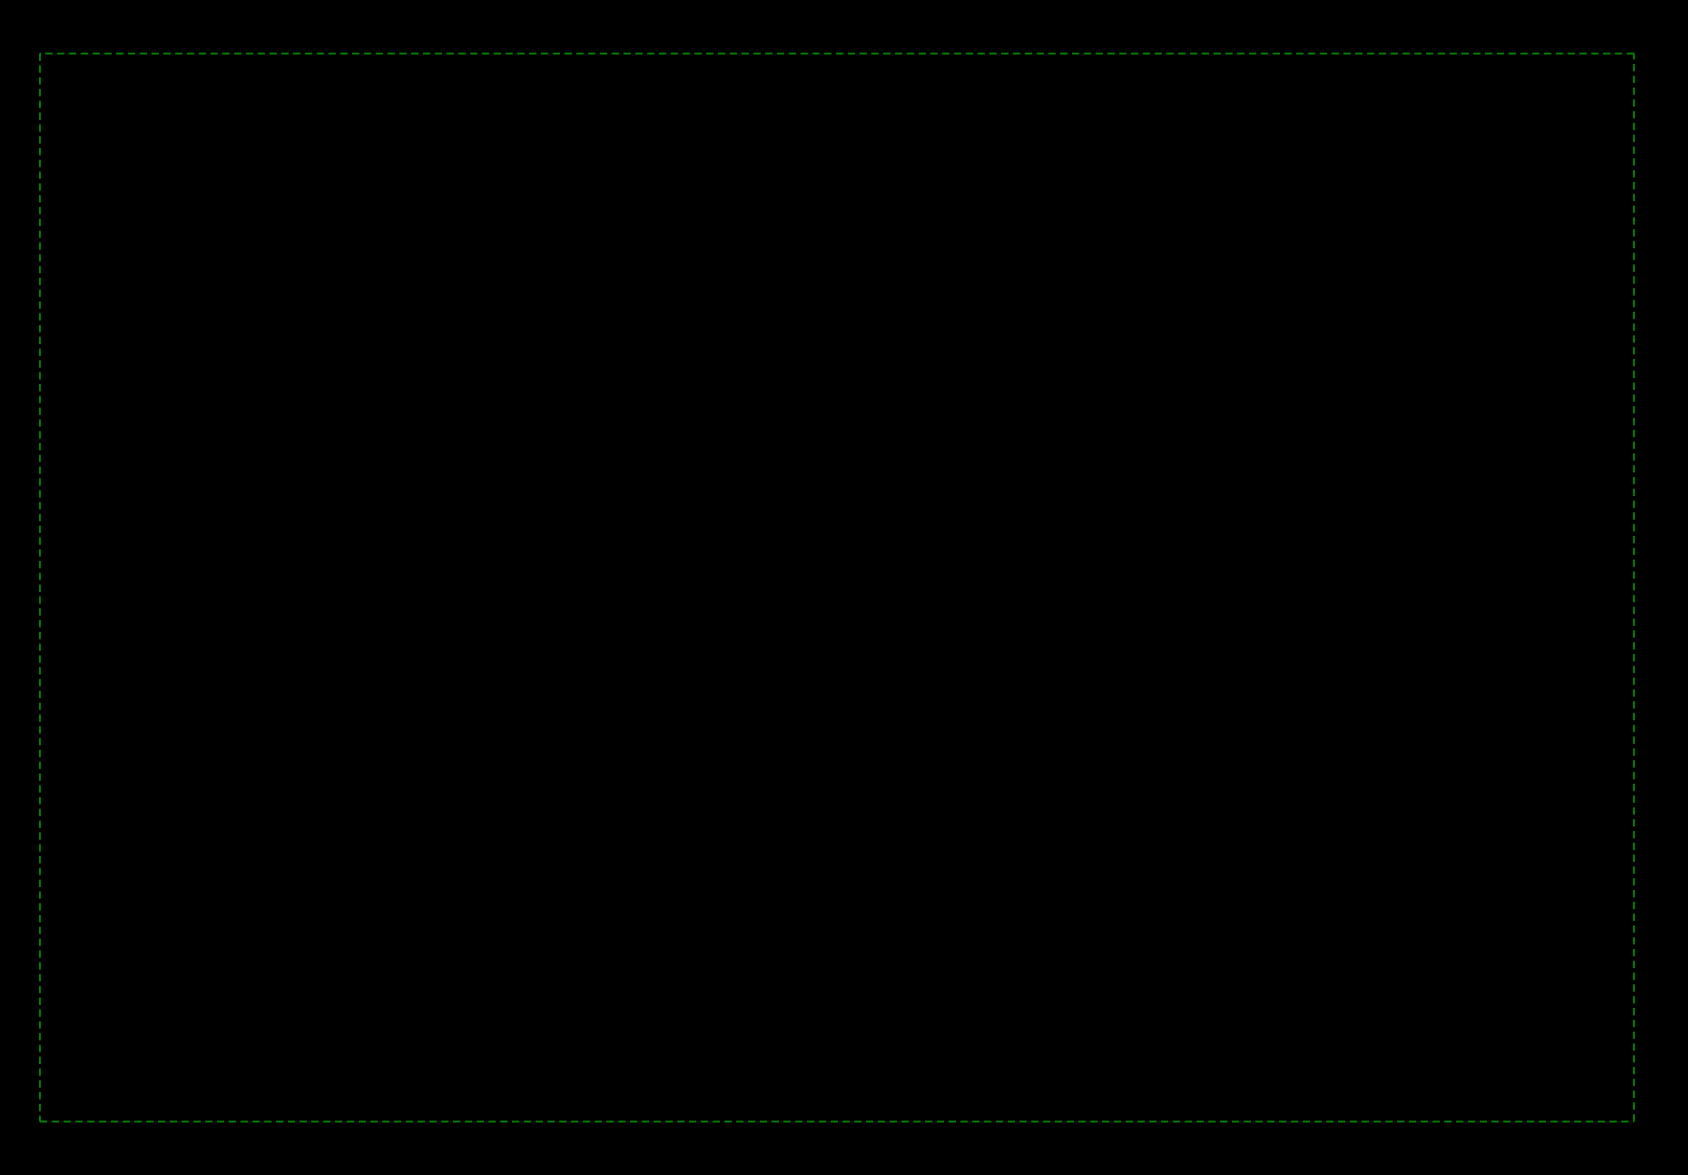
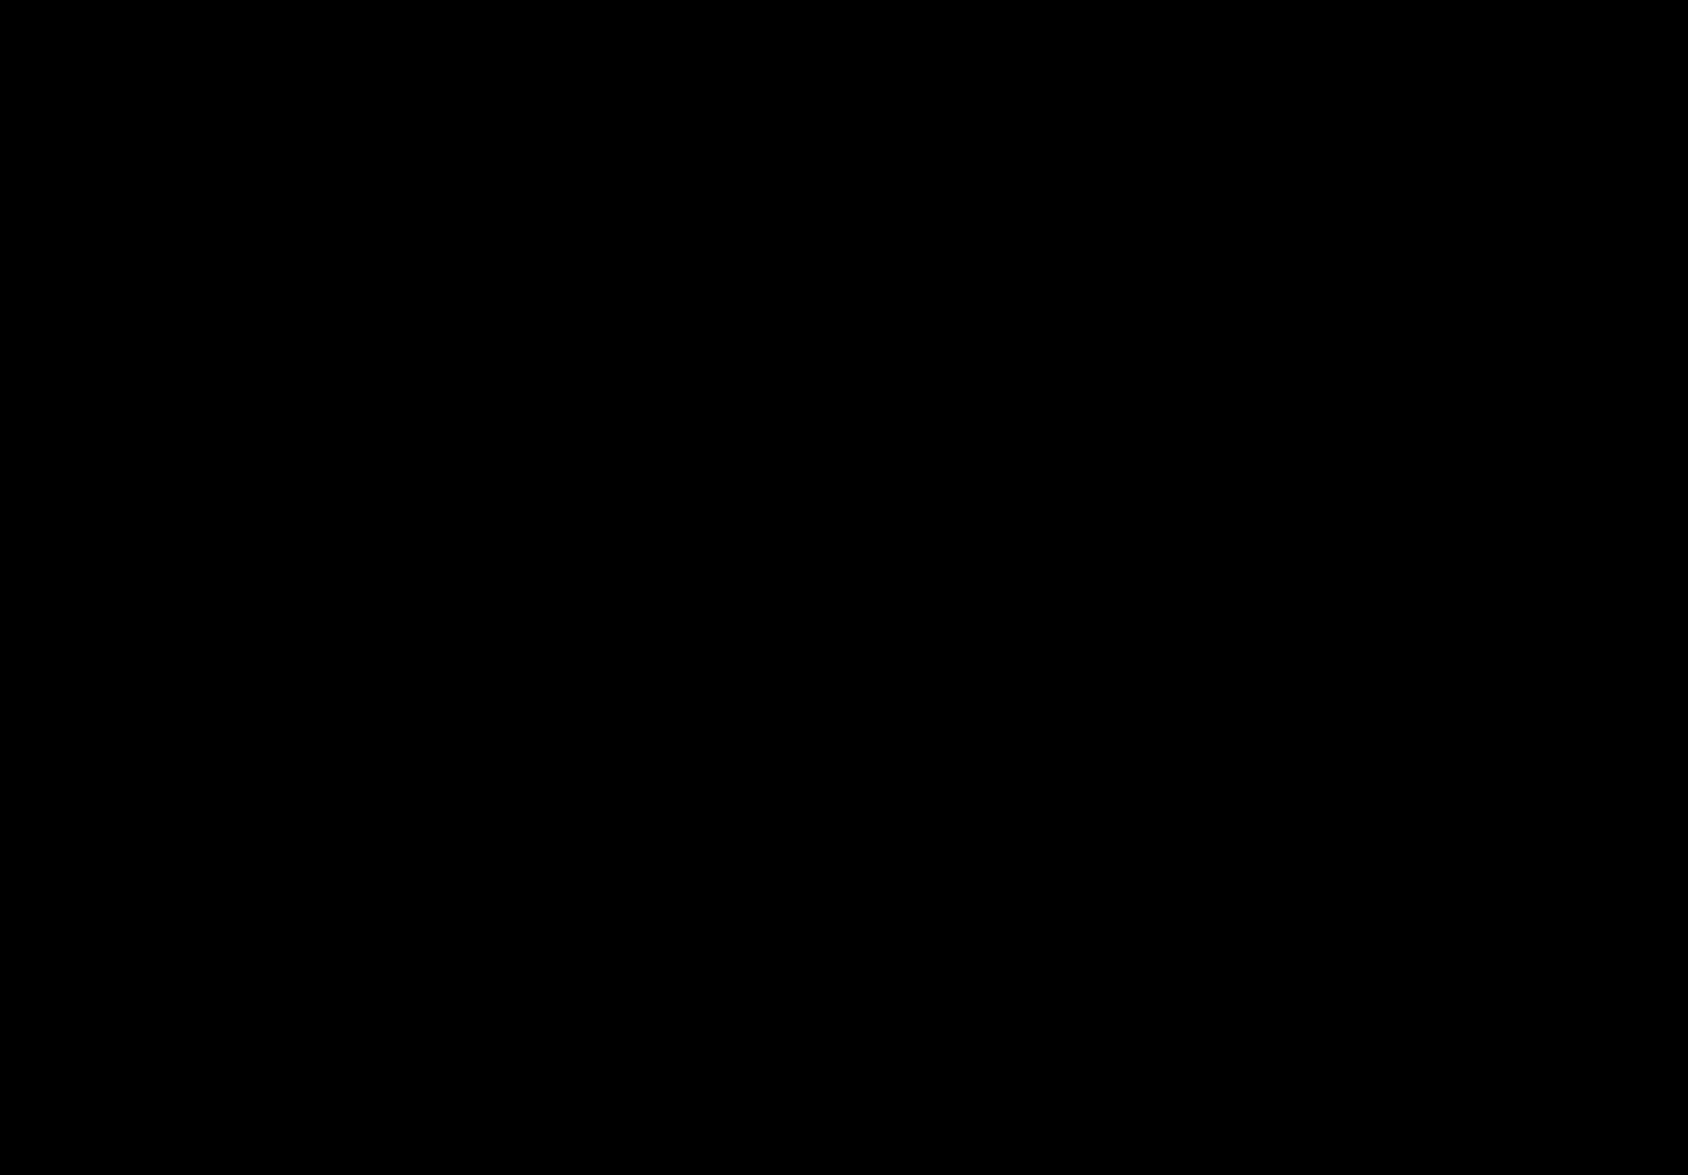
zone outline: (1633, 53) (1633, 1121) (39, 1121) (39, 53) (1633, 53) -> none

